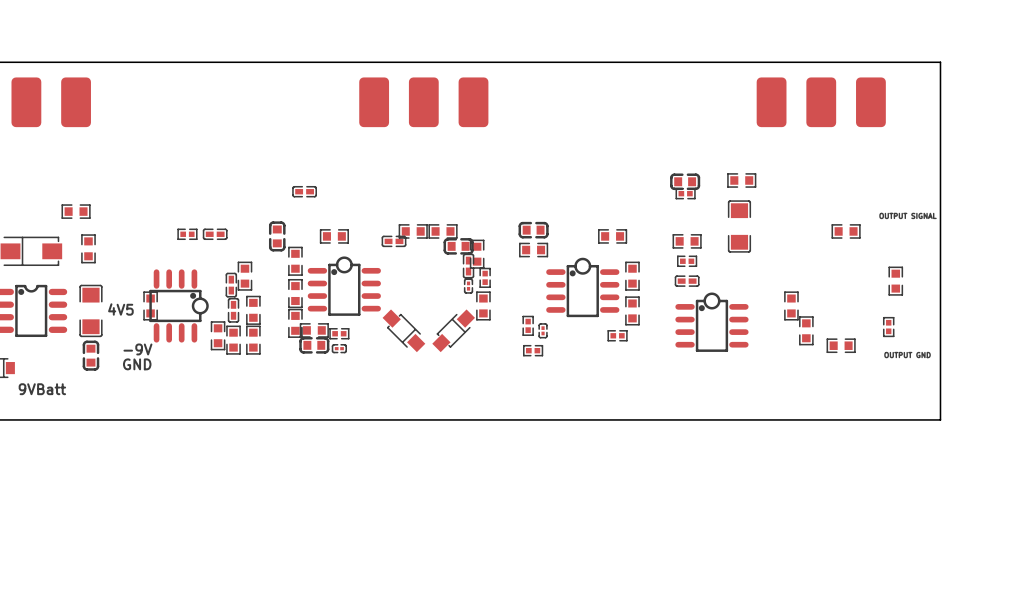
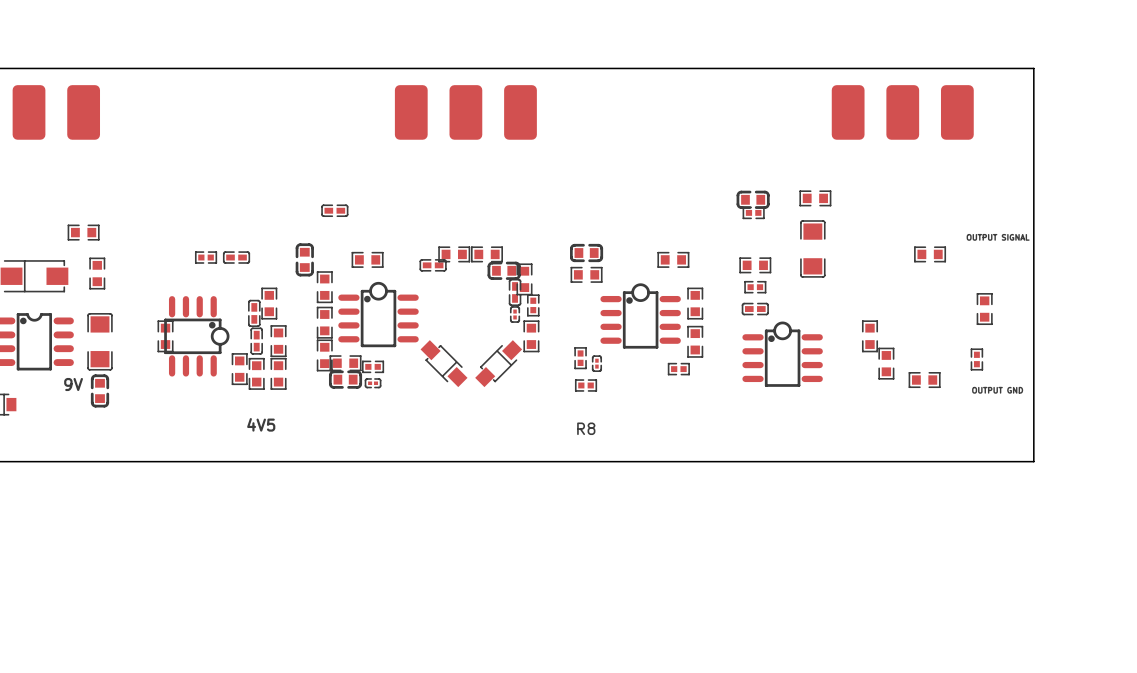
text position: 4V5 (120, 309) -> 4V5 (261, 424)
text: none -> 9V (73, 384)
text: -9V (137, 349) -> none
text: GND (137, 364) -> none
text: 9VBatt (42, 389) -> none
R8 name: none -> R8 (586, 428)

